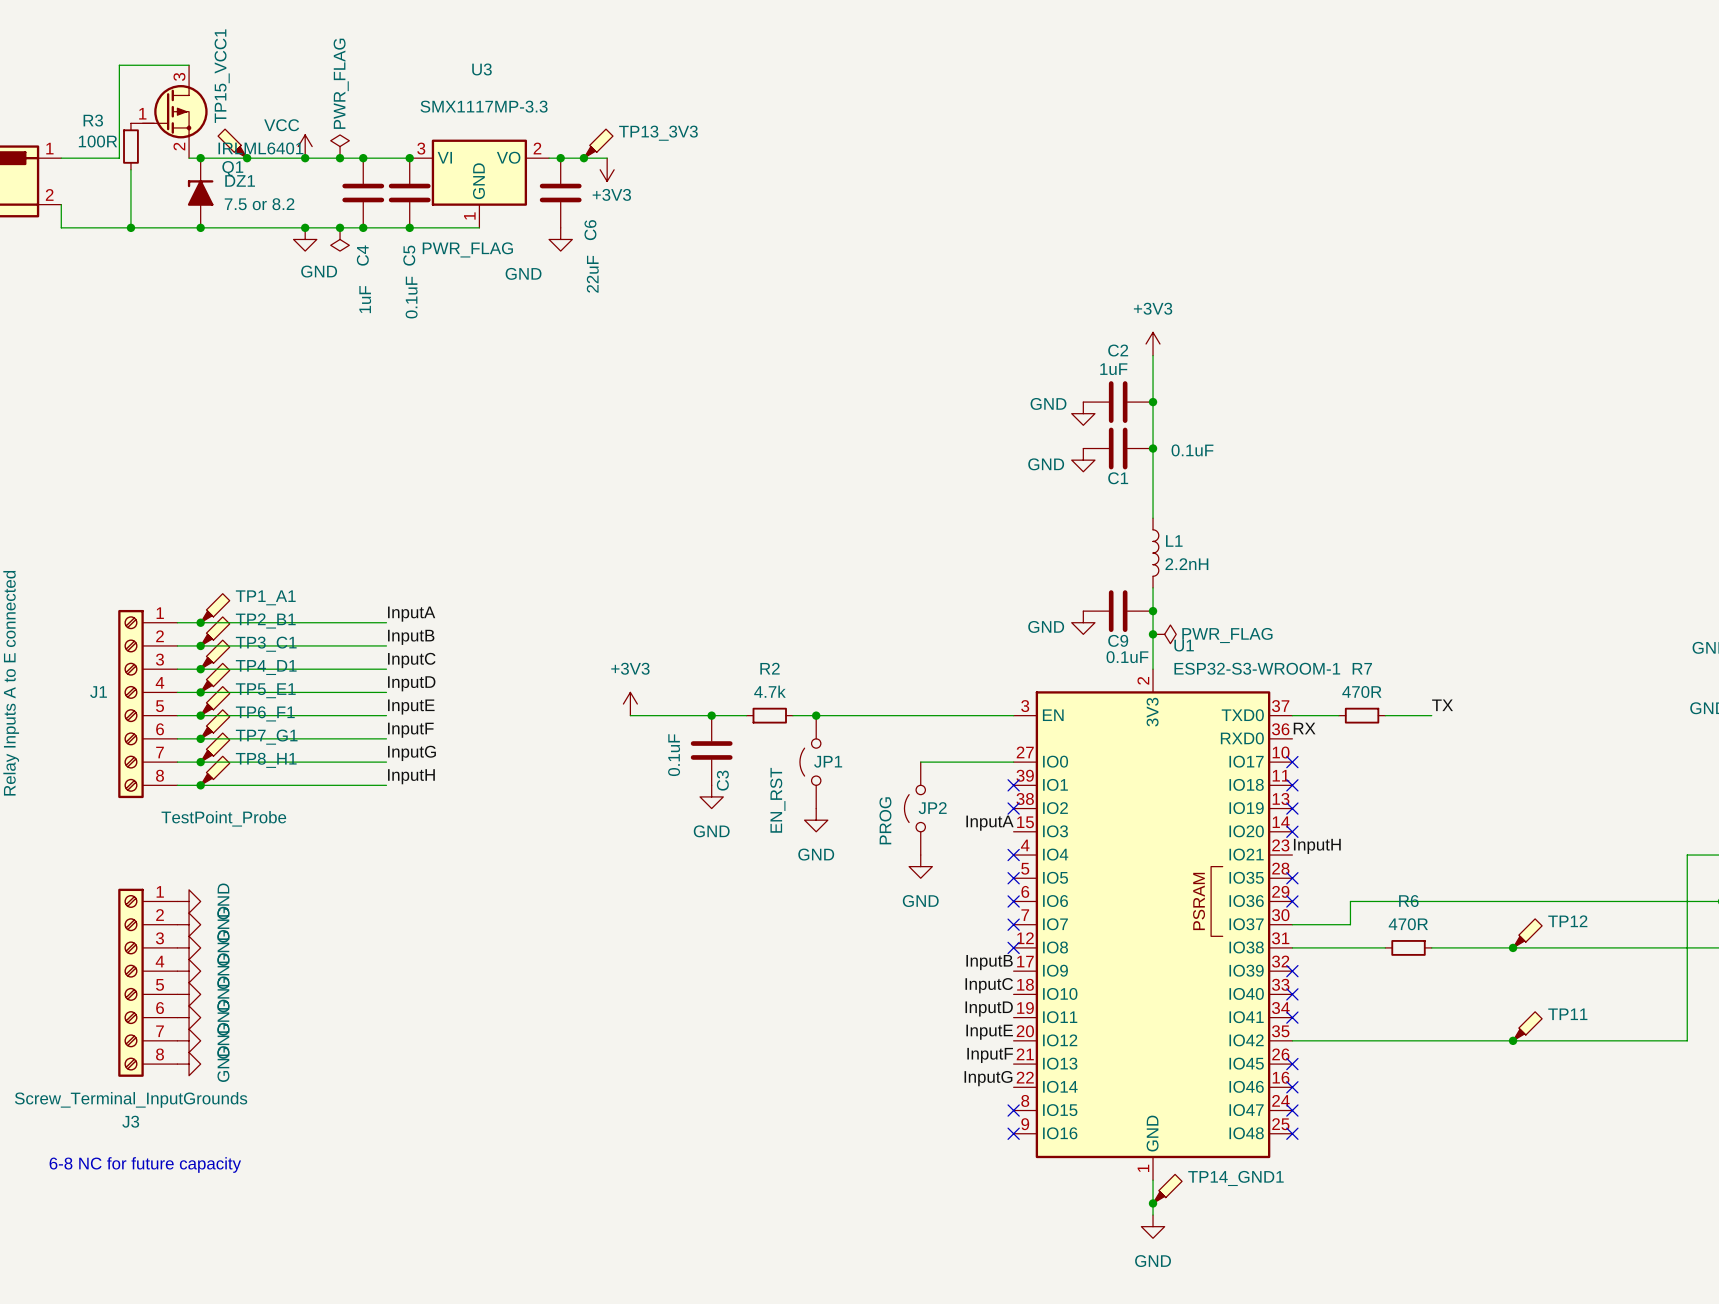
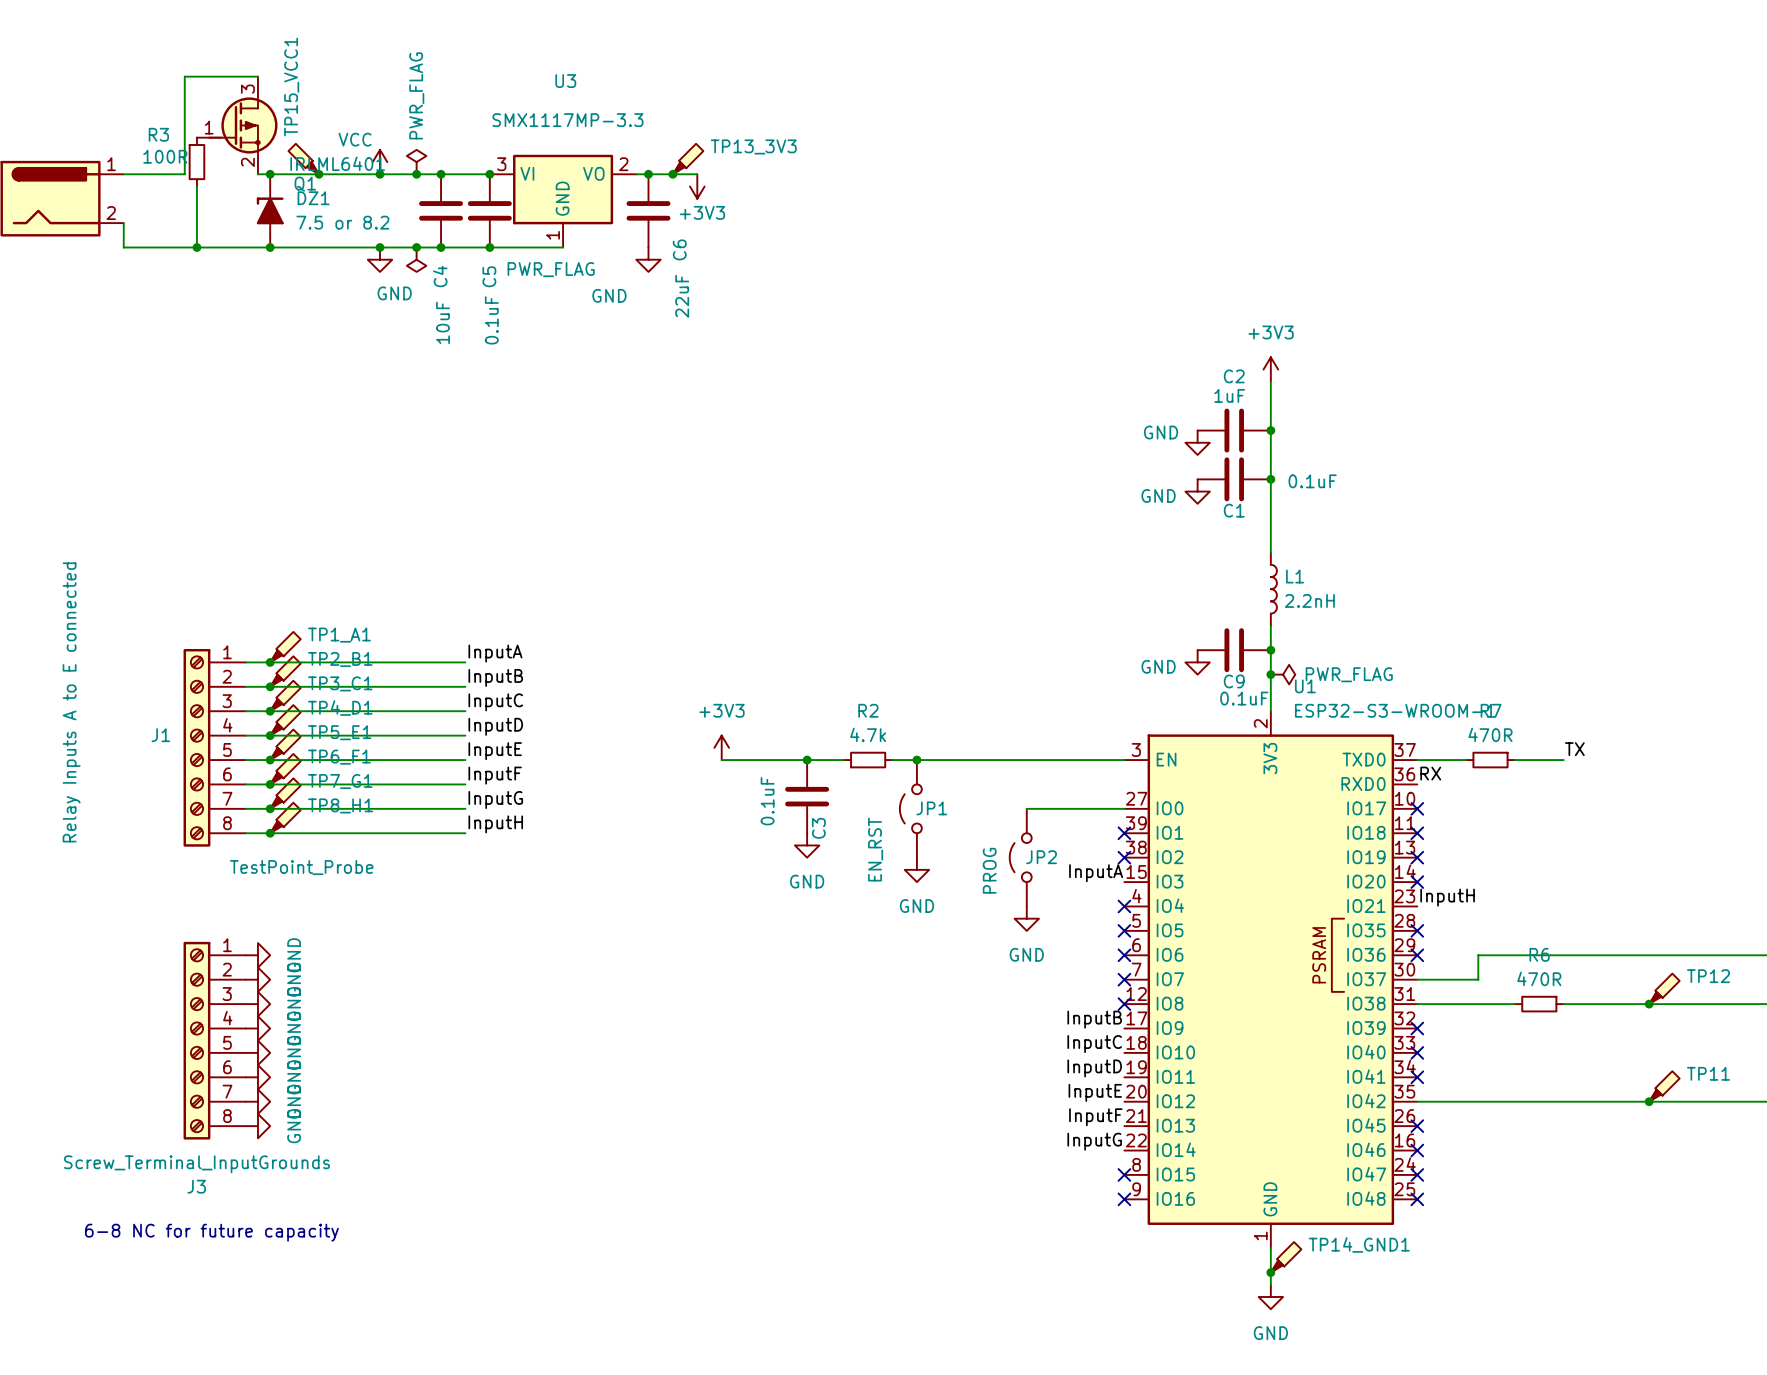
C4 value: 1uF (365, 299) -> 10uF (443, 322)

